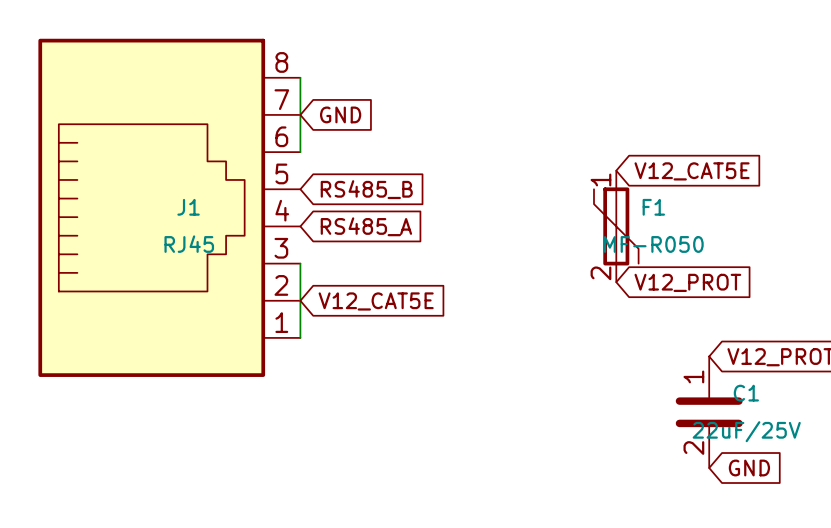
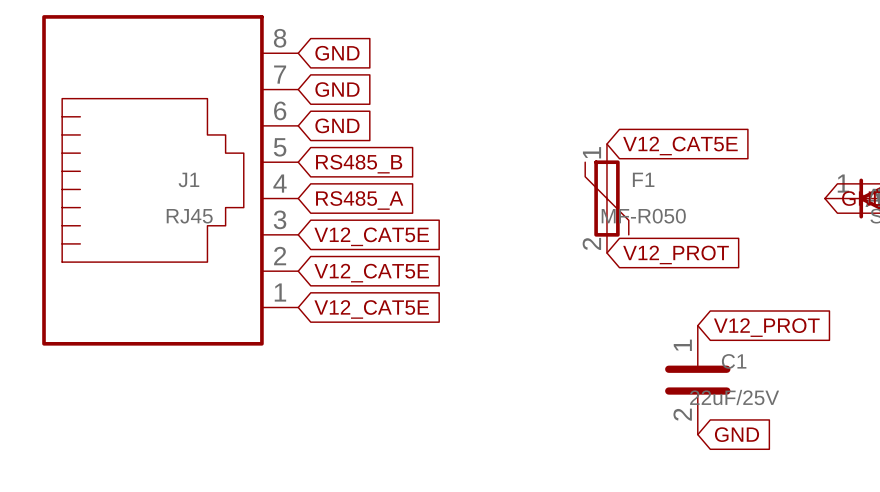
wire: (300, 77) (300, 152) -> none
global label: none -> GND (337, 53)
global label: none -> GND (337, 125)
wire: (300, 263) (300, 337) -> none
global label: none -> V12_CAT5E (371, 236)
global label: none -> V12_CAT5E (371, 309)

